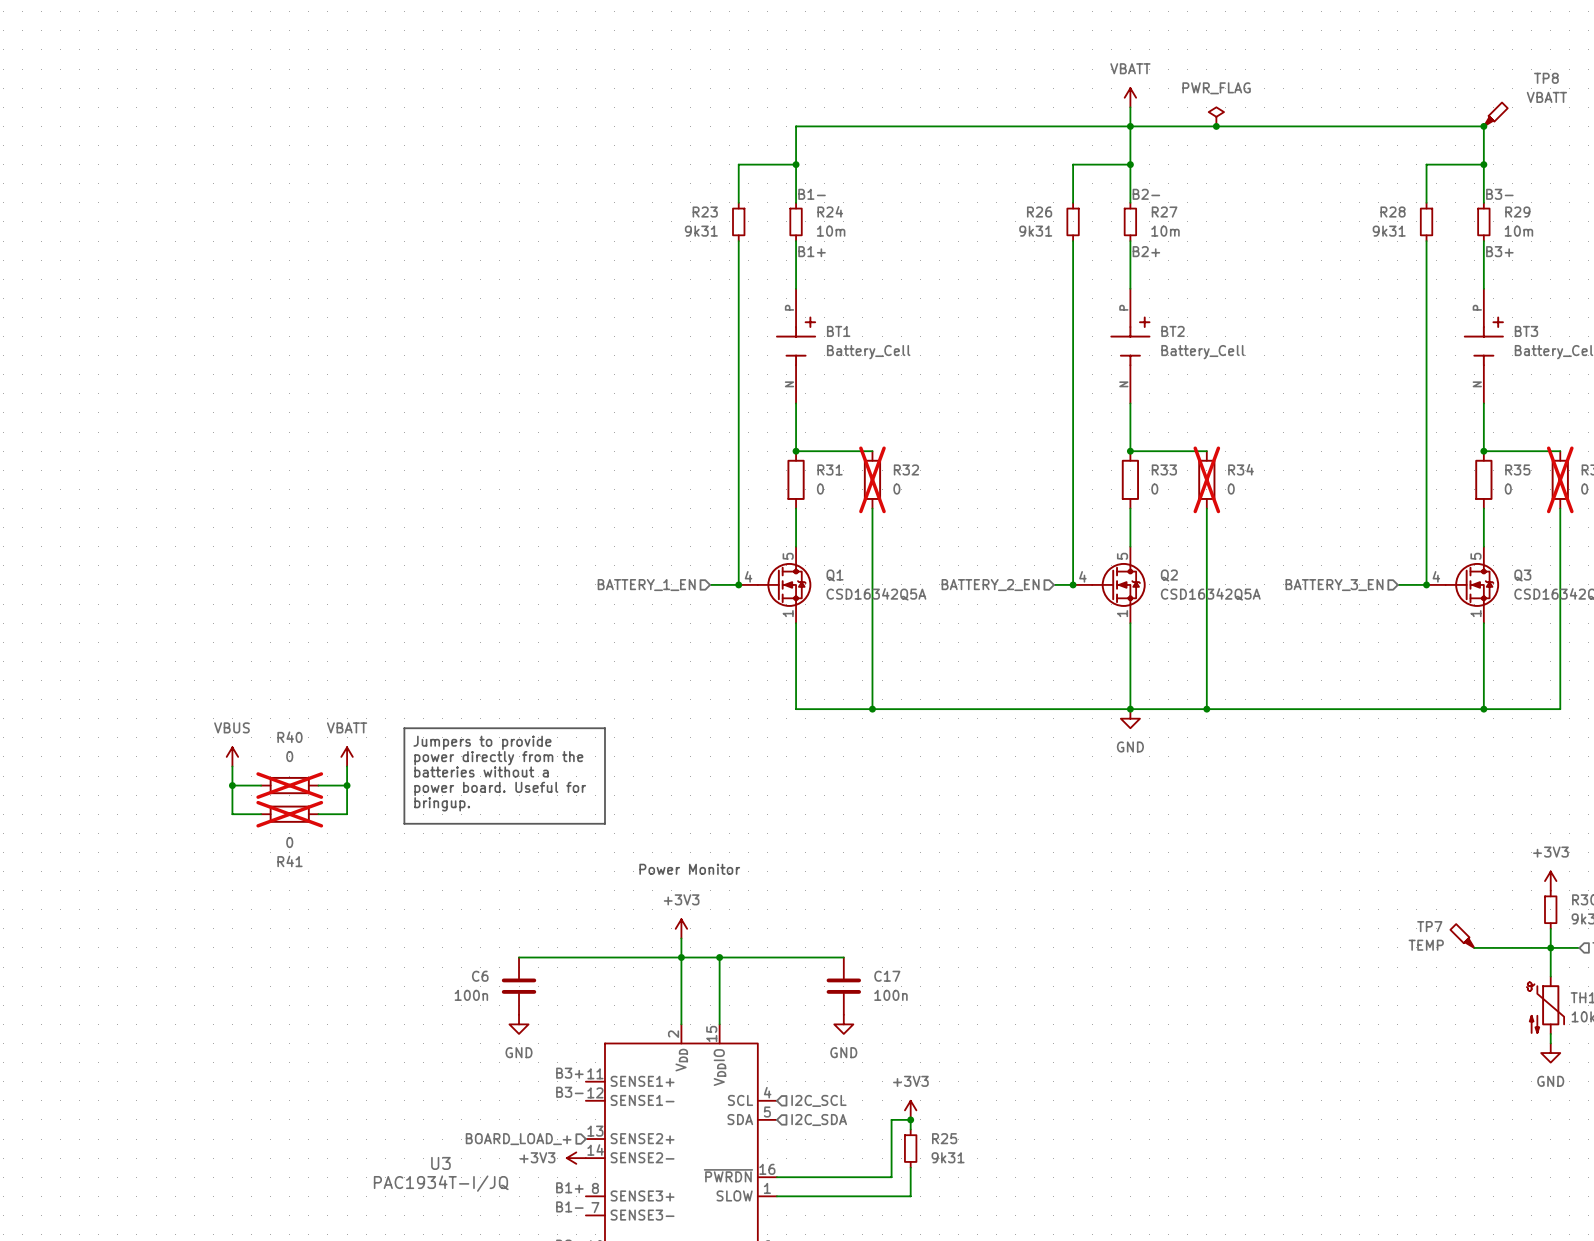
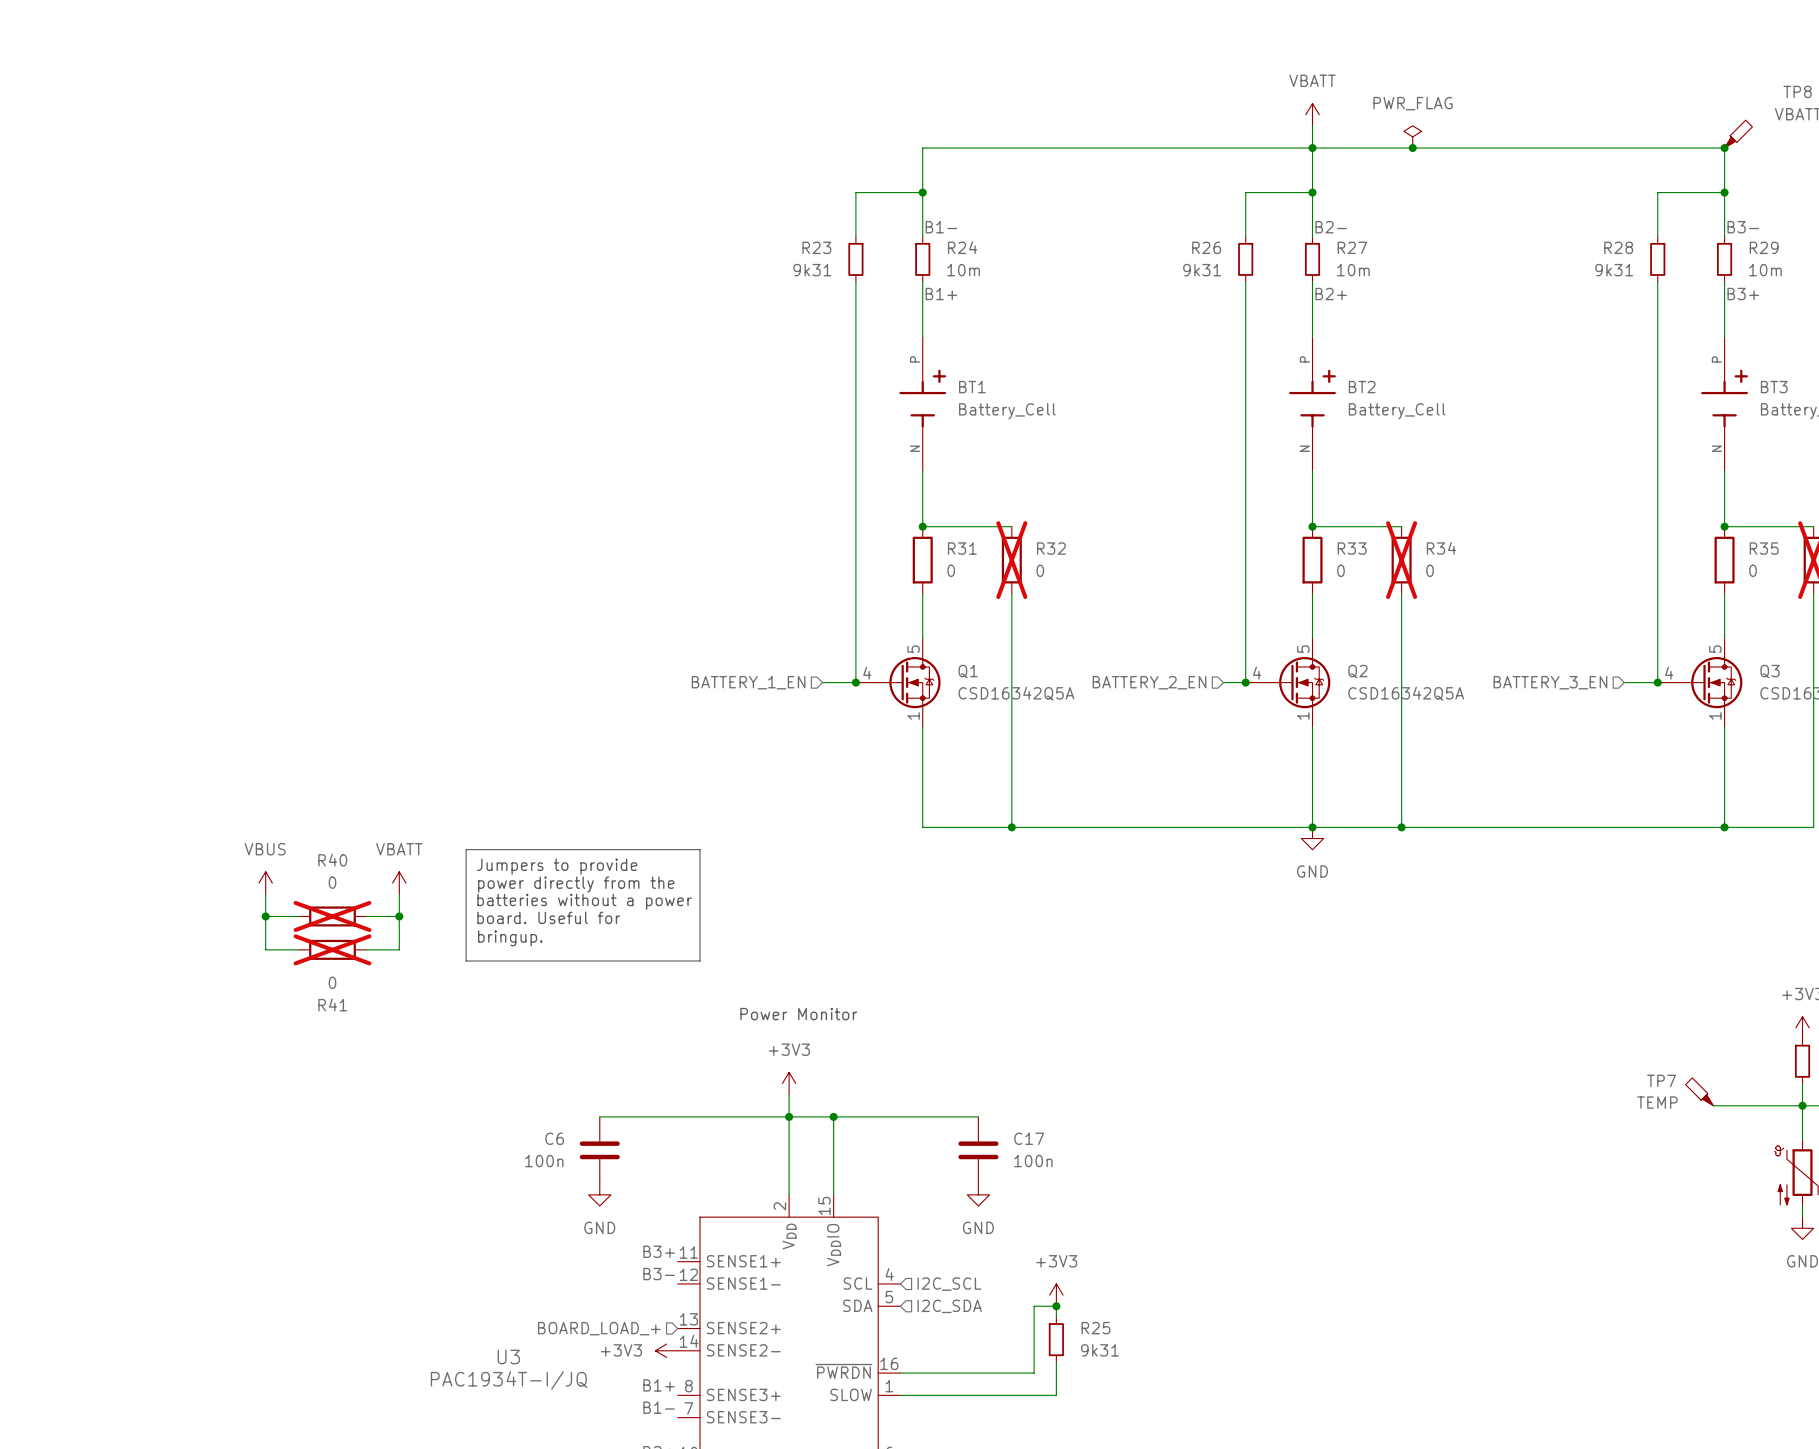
text: batteries without a (481, 771) -> batteries without a power (584, 901)
text: power board. Useful for (500, 788) -> board. Useful for (548, 917)

